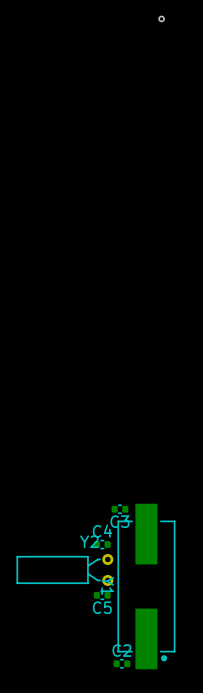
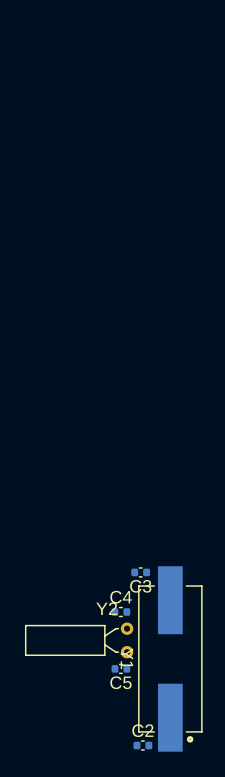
via: (161, 18) -> none

